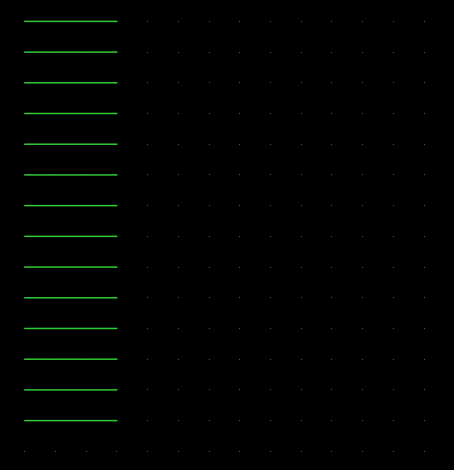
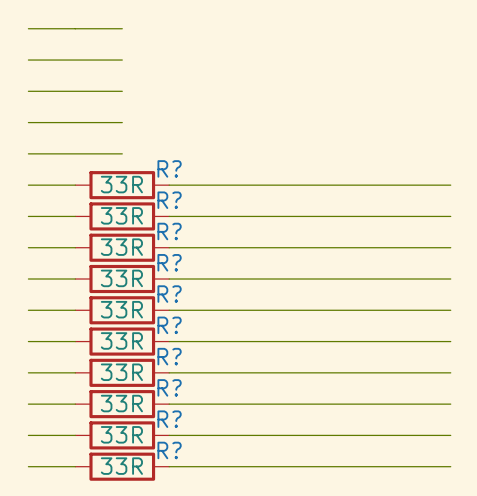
wire: (70, 144) (116, 144) -> none
R?: none -> 33R (122, 185)
wire: none -> (169, 185) (450, 185)
wire: (70, 174) (116, 174) -> none
R?: none -> 33R (122, 216)
wire: none -> (169, 216) (450, 216)
wire: (70, 205) (116, 205) -> none
R?: none -> 33R (122, 247)
wire: none -> (169, 247) (450, 247)
wire: (70, 236) (116, 236) -> none
R?: none -> 33R (122, 279)
wire: none -> (169, 279) (450, 279)
wire: (70, 267) (116, 267) -> none
R?: none -> 33R (122, 310)
wire: none -> (169, 310) (450, 310)
wire: (70, 297) (116, 297) -> none
R?: none -> 33R (122, 341)
wire: none -> (169, 341) (450, 341)
wire: (70, 328) (116, 328) -> none
R?: none -> 33R (122, 372)
wire: none -> (169, 372) (450, 372)
wire: (70, 359) (116, 359) -> none
R?: none -> 33R (122, 404)
wire: none -> (169, 404) (450, 404)
wire: (70, 389) (116, 389) -> none
R?: none -> 33R (122, 435)
wire: none -> (169, 435) (450, 435)
wire: (70, 420) (116, 420) -> none
R?: none -> 33R (122, 466)
wire: none -> (169, 466) (450, 466)

